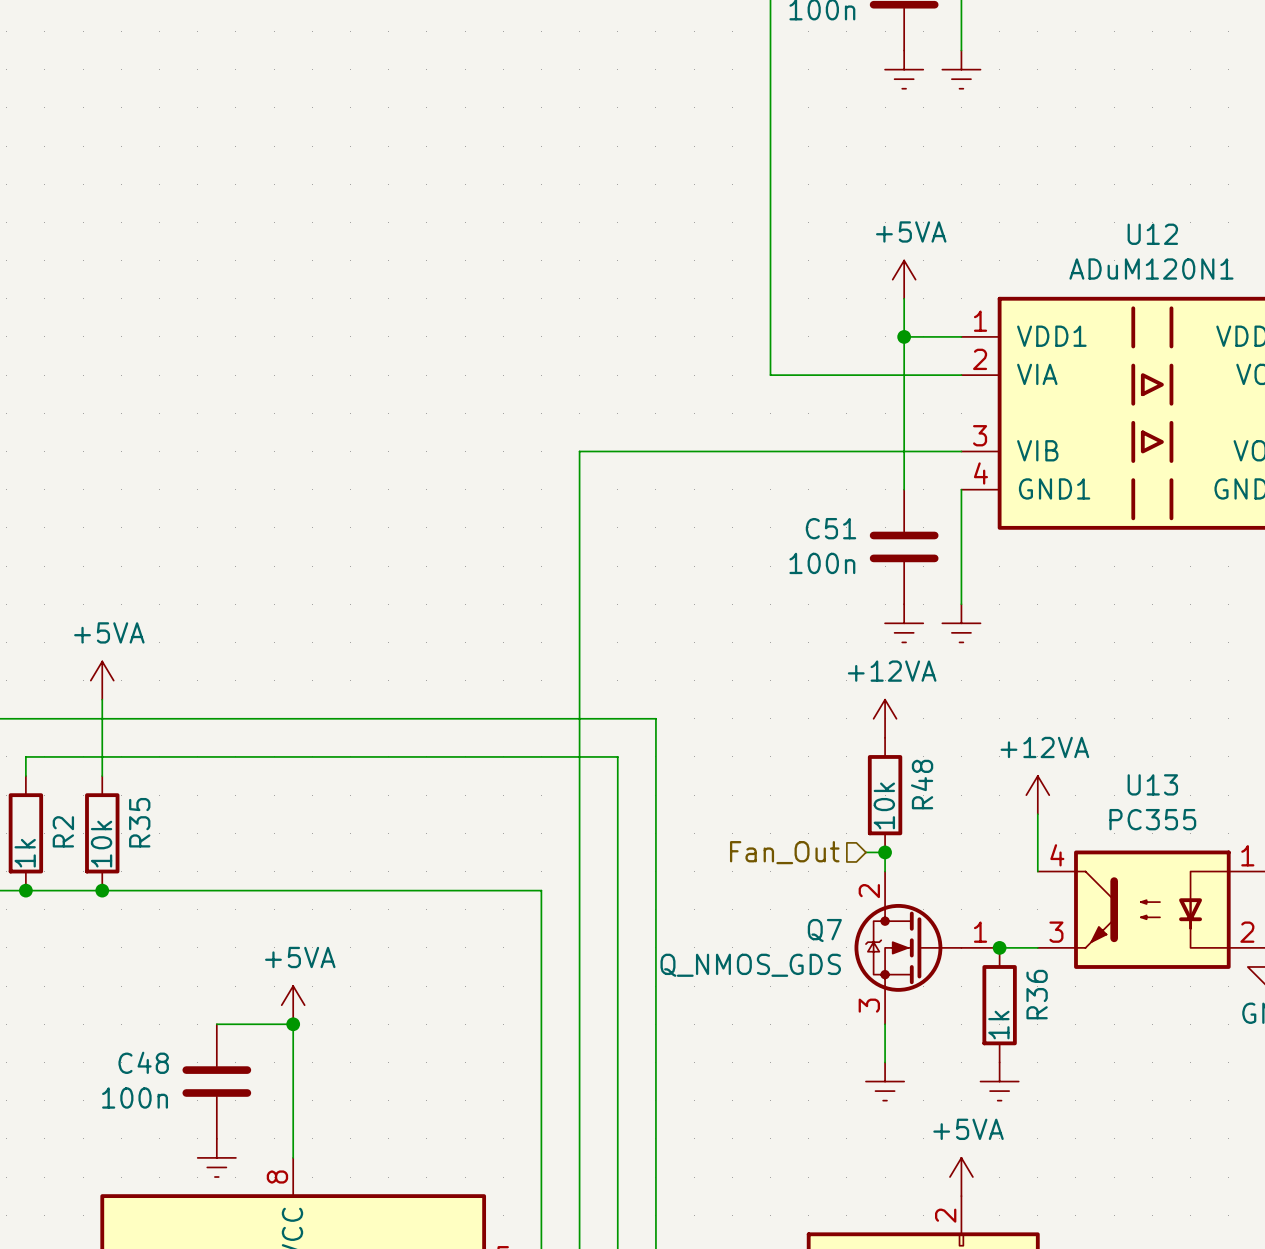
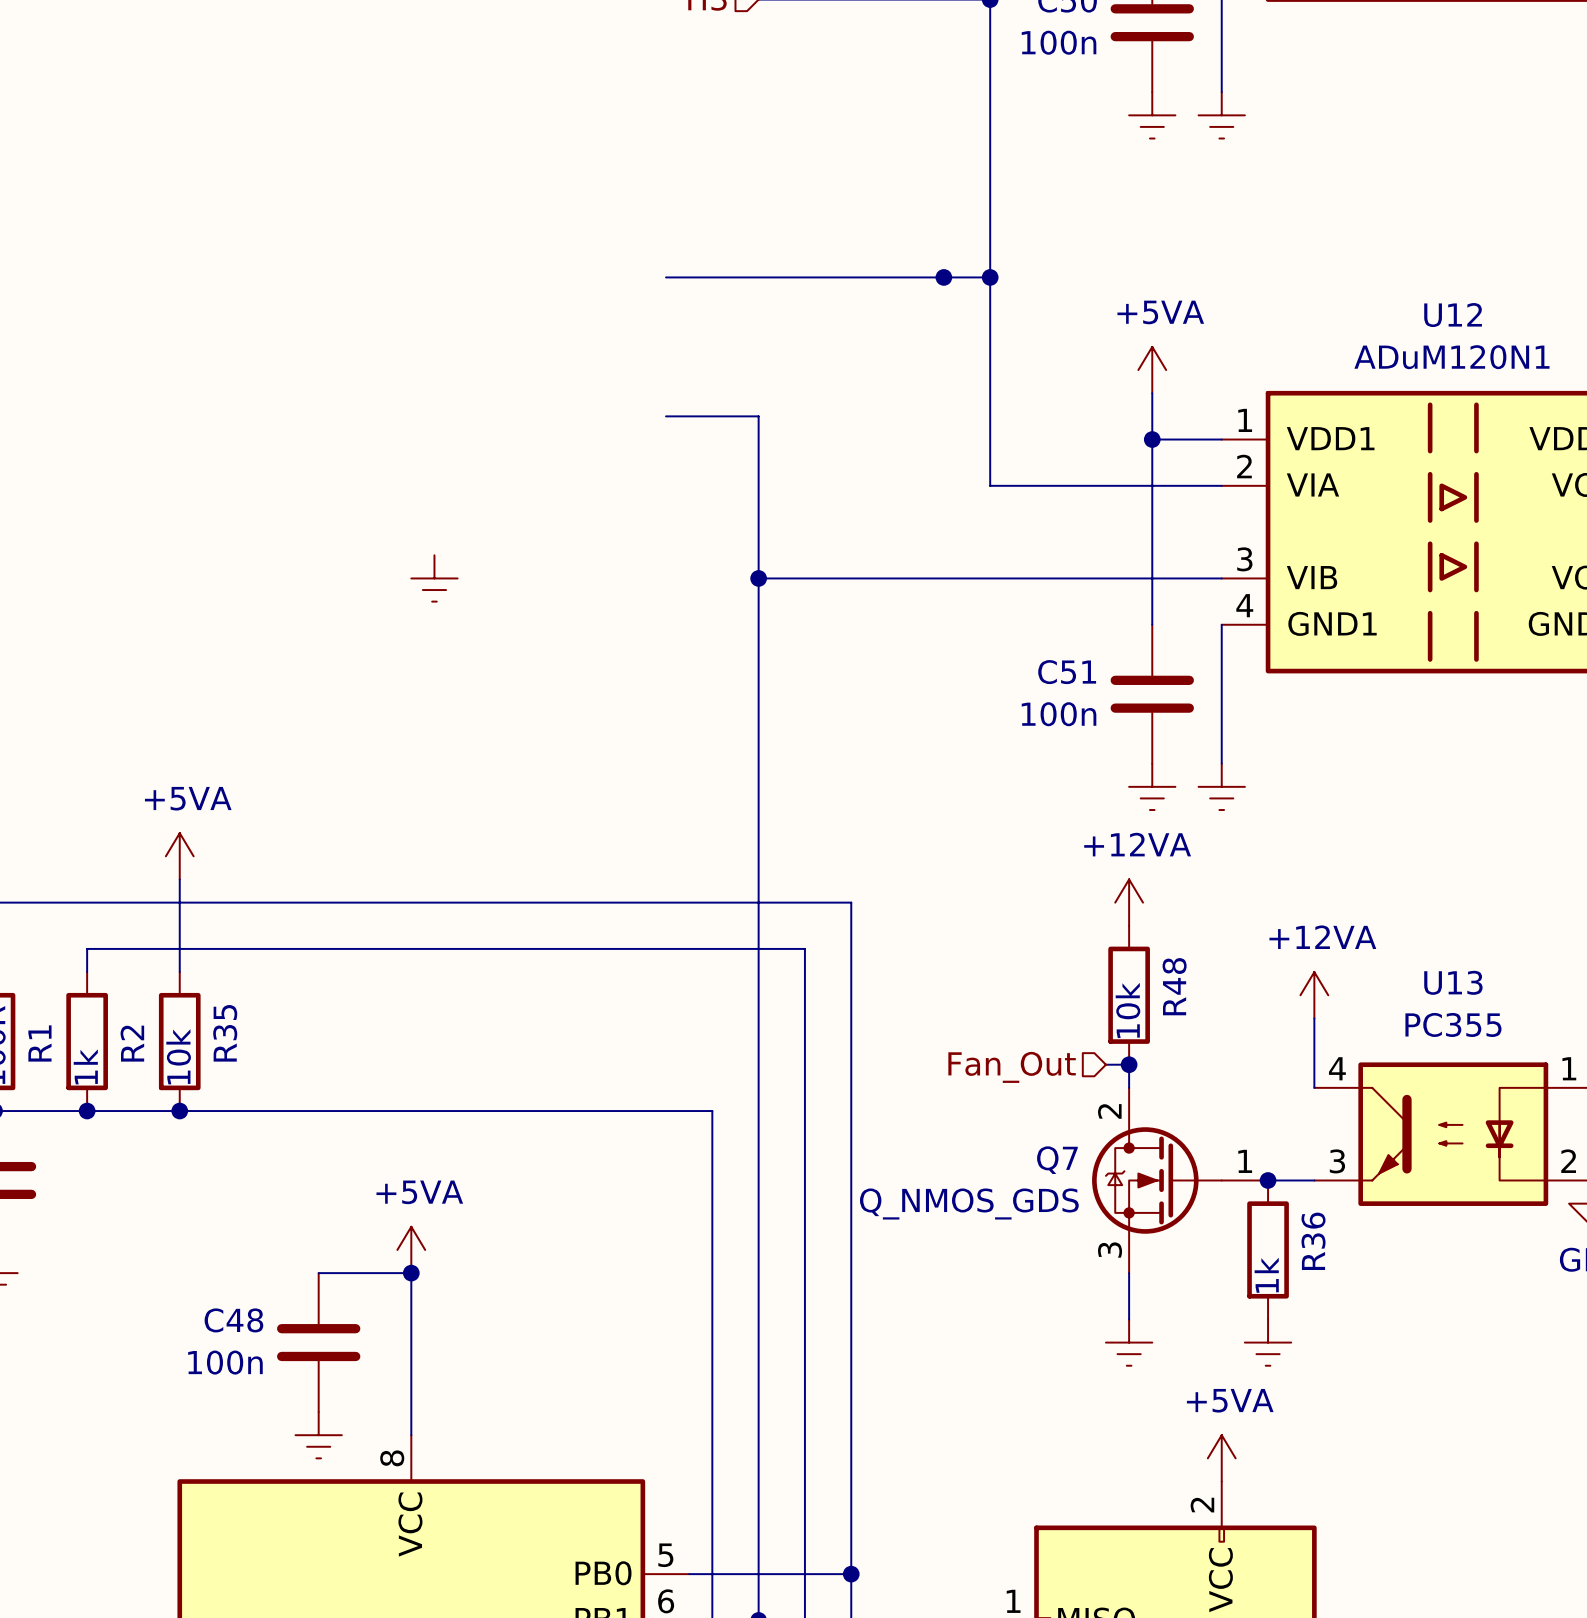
wire: none -> (666, 277) (990, 277)
junction: none -> (943, 277)
junction: none -> (990, 277)
wire: none -> (666, 416) (758, 416) (758, 578)
power symbol: none -> (434, 578)
junction: none -> (758, 578)

